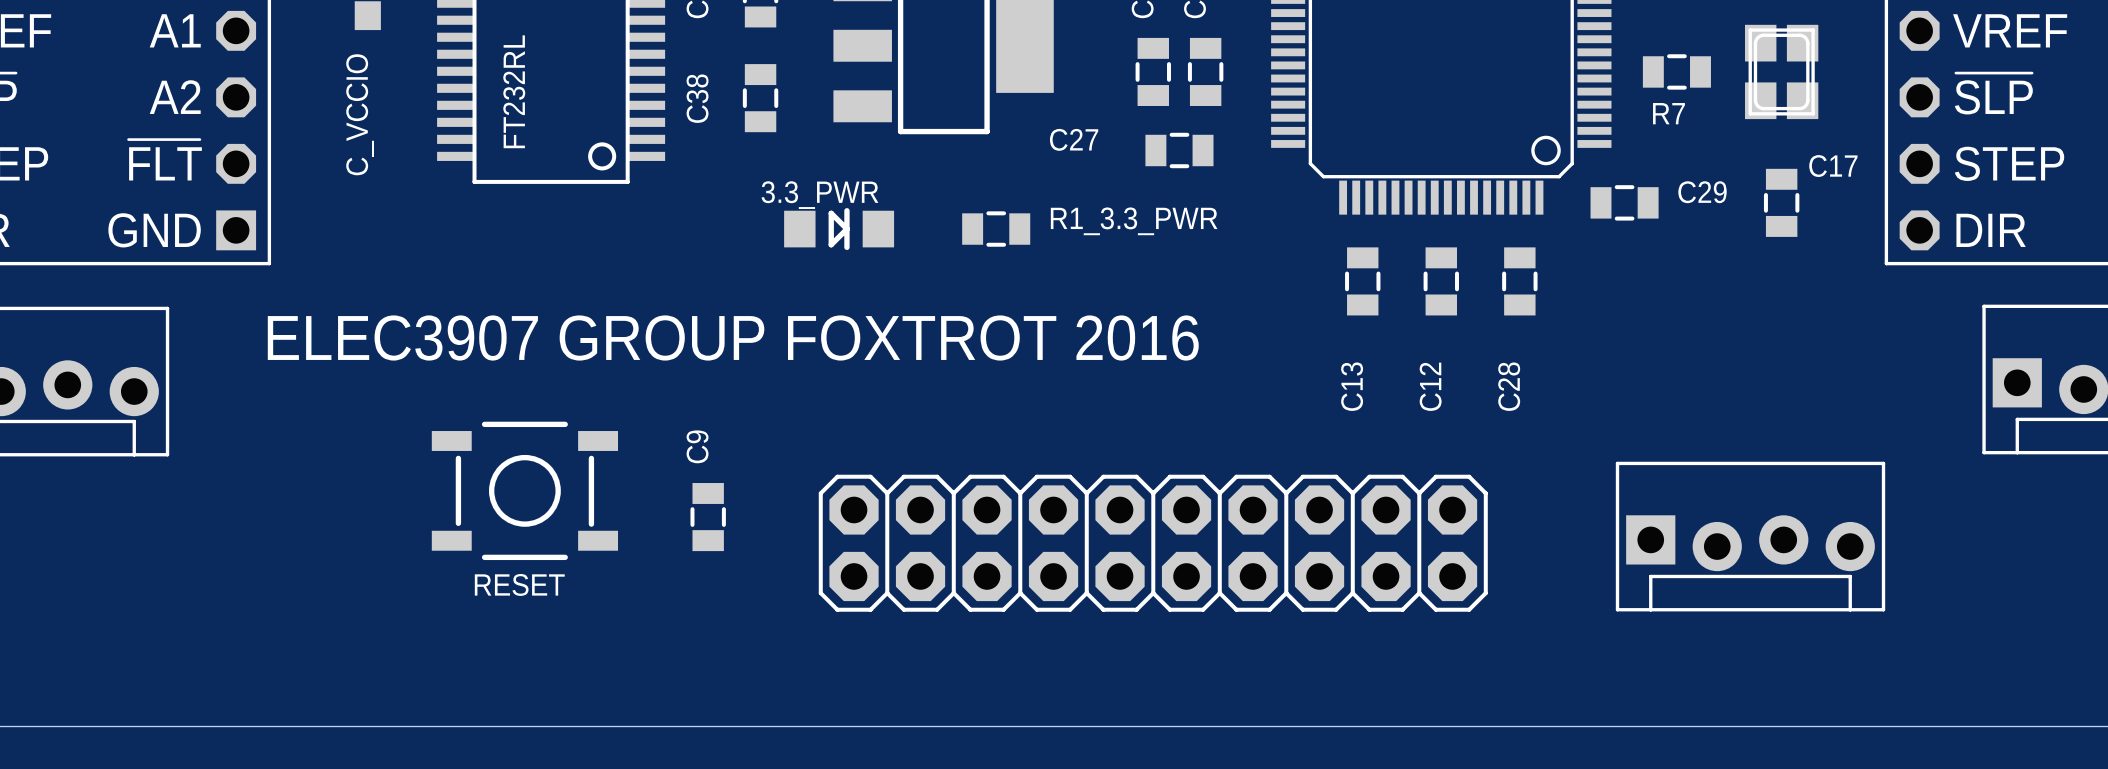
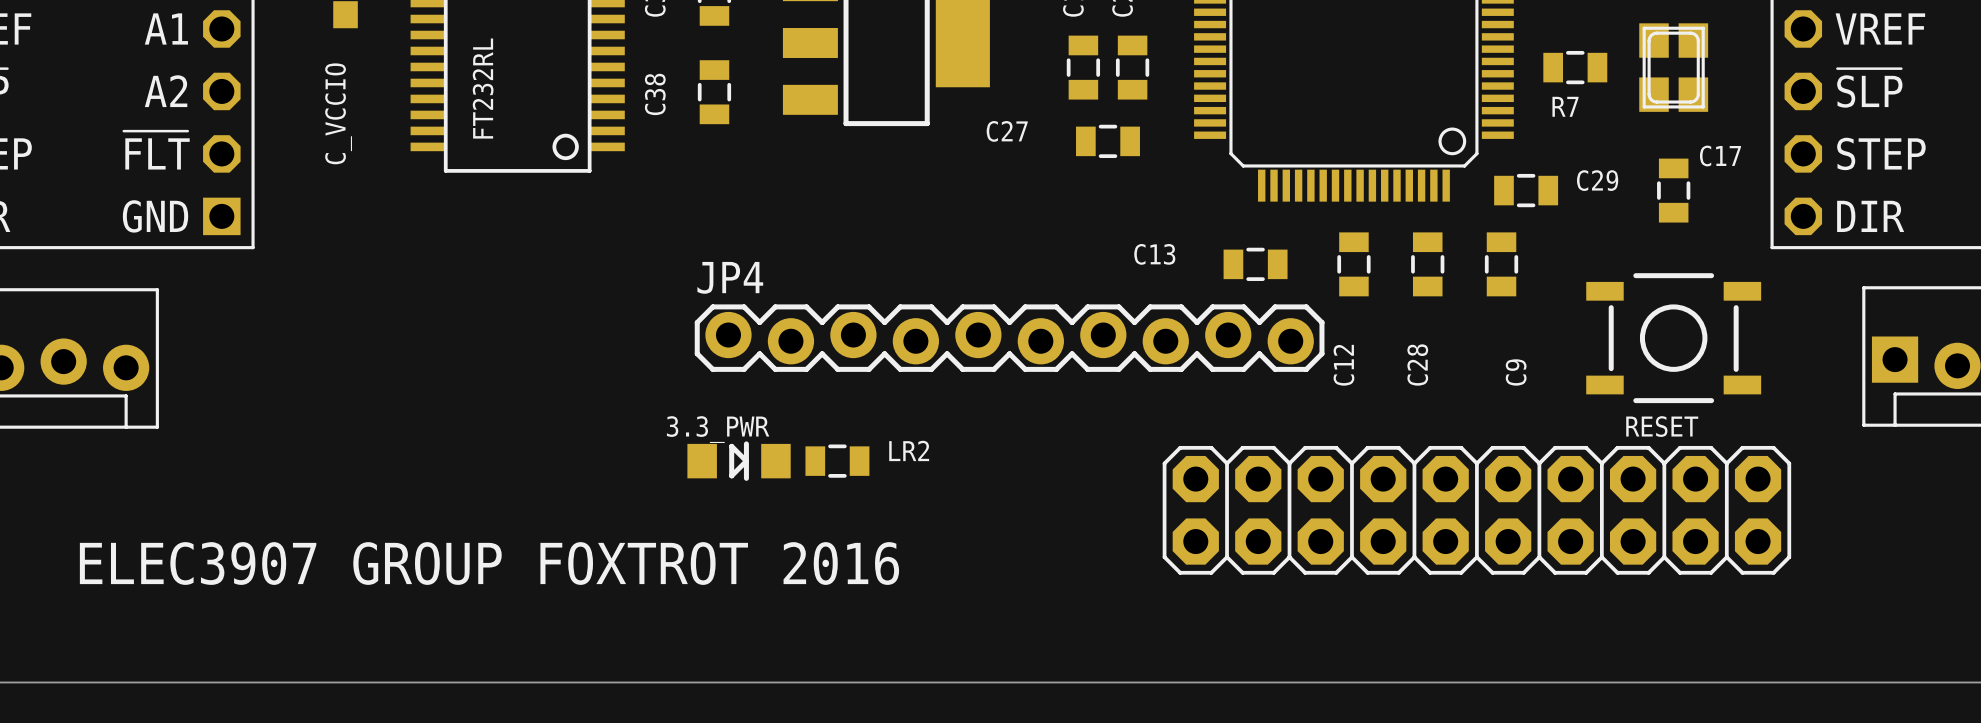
3.3_PWR position: (839, 229) -> (739, 461)
R1_3.3_PWR: (996, 229) -> none
C13 rotation: 0° (1362, 281) -> 90° clockwise (1255, 264)
text position: ELEC3907 GROUP FOXTROT 2016 (733, 338) -> ELEC3907 GROUP FOXTROT 2016 (489, 563)
JP4: none -> (1009, 338)
RESET: none -> (1673, 338)
C9 name position: C9 (697, 446) -> C9 (1516, 372)
RESET: (524, 490) -> none
LR2: none -> (837, 461)
C9 position: (708, 517) -> (1501, 264)
part: (1750, 536) -> none
part position: (1153, 543) -> (1476, 510)

